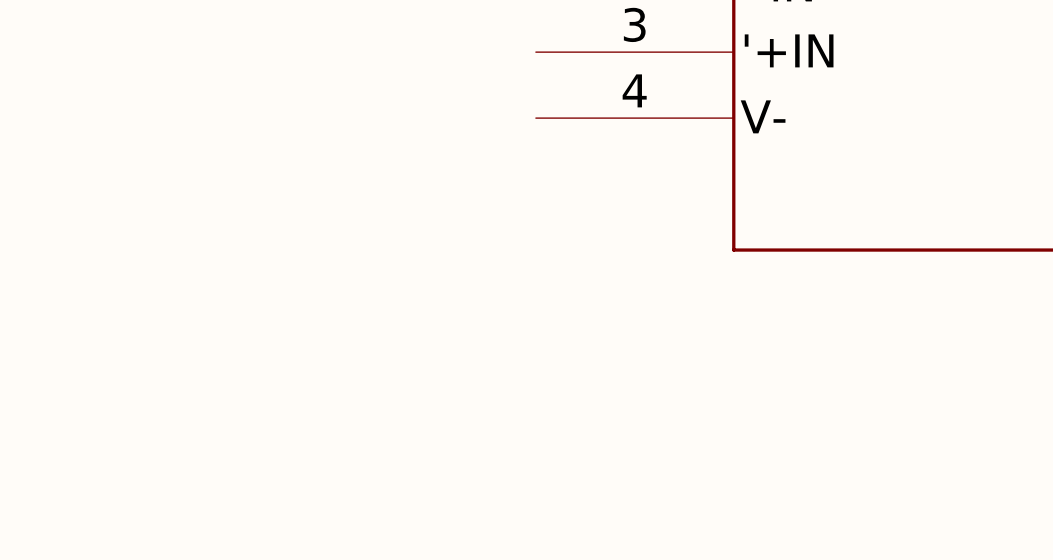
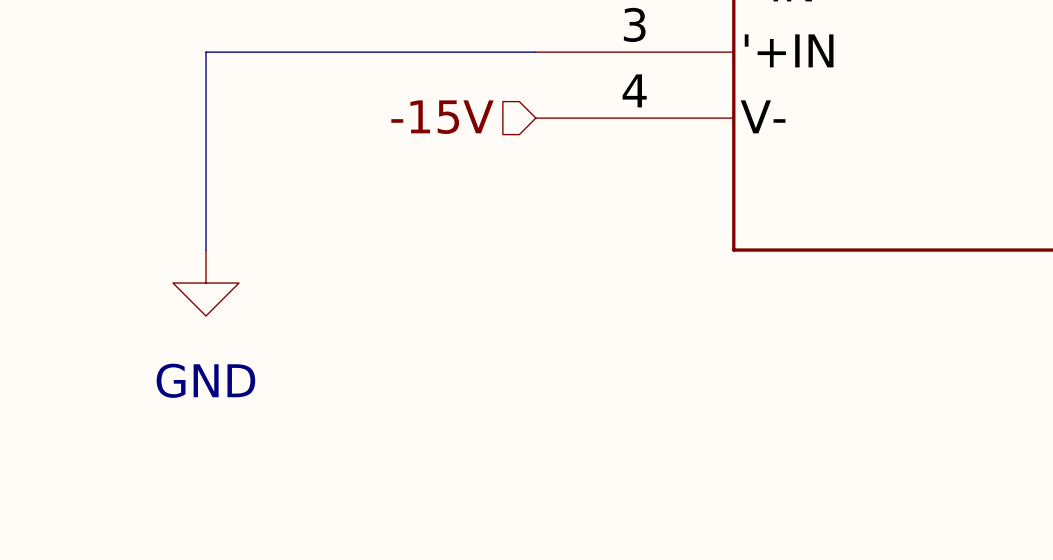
wire: none -> (535, 52) (206, 52) (206, 250)
hierarchical label: none -> -15V (442, 117)
power symbol: none -> GND (206, 283)

